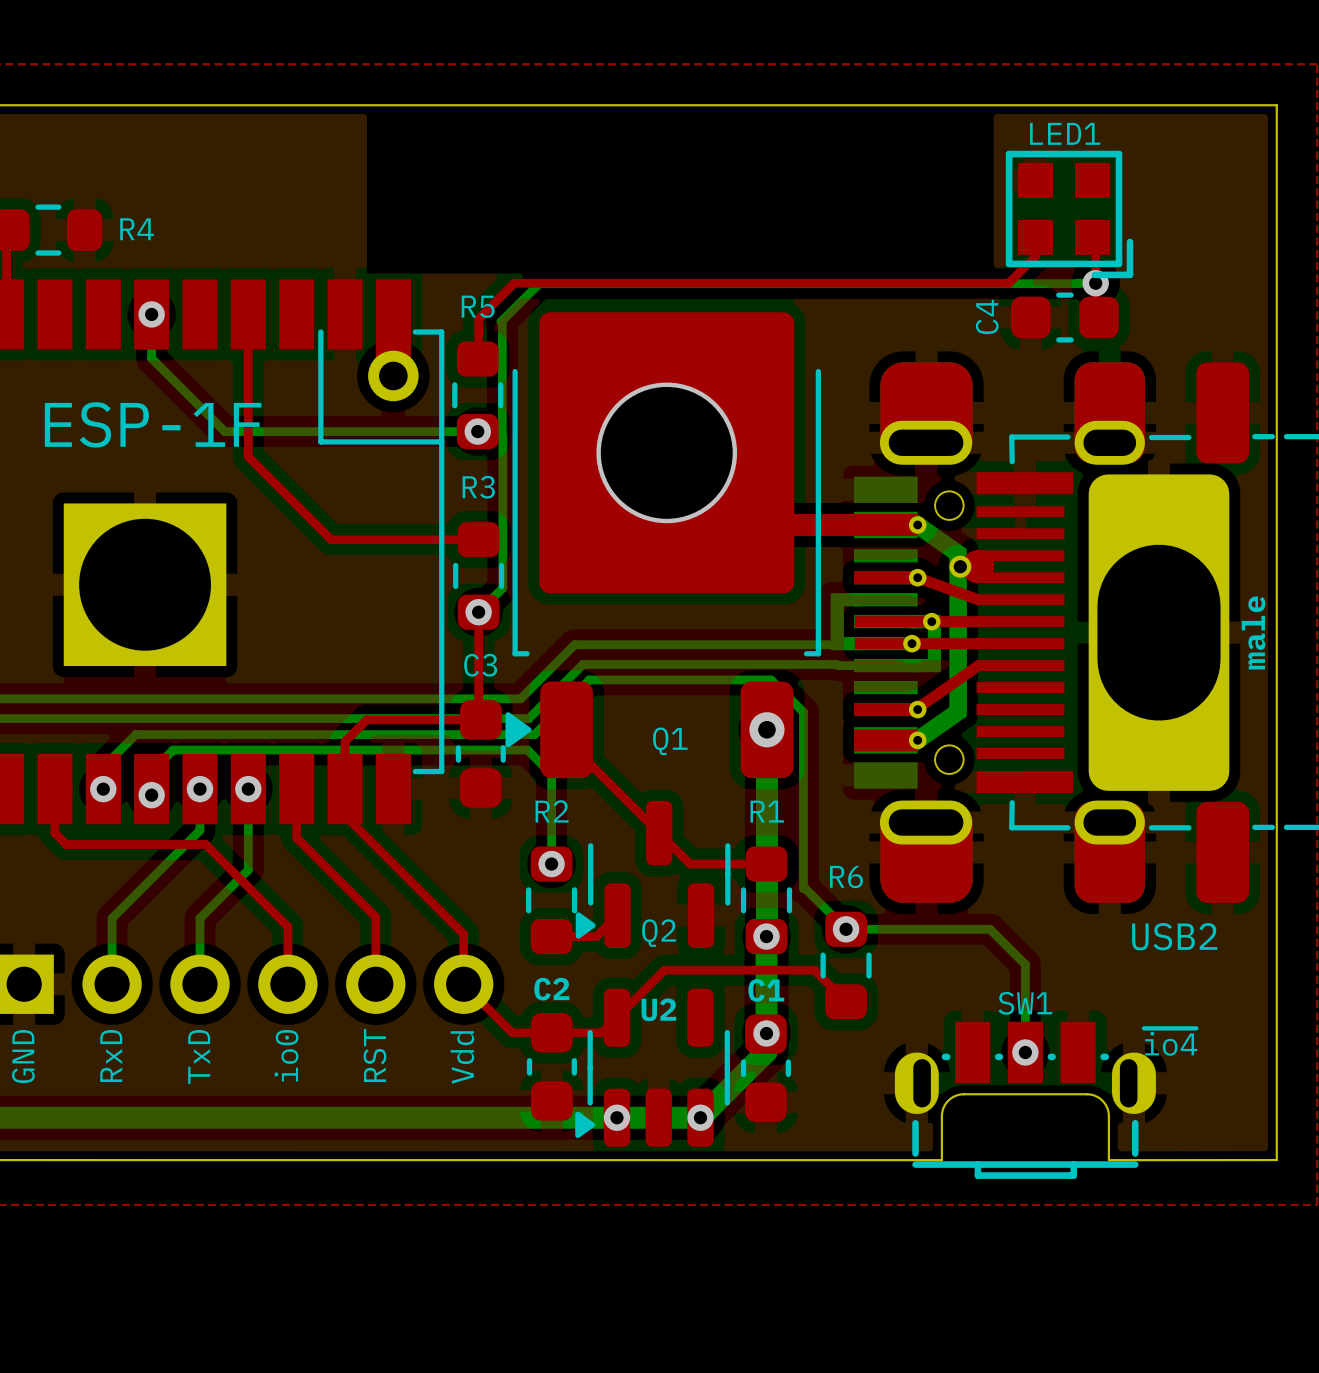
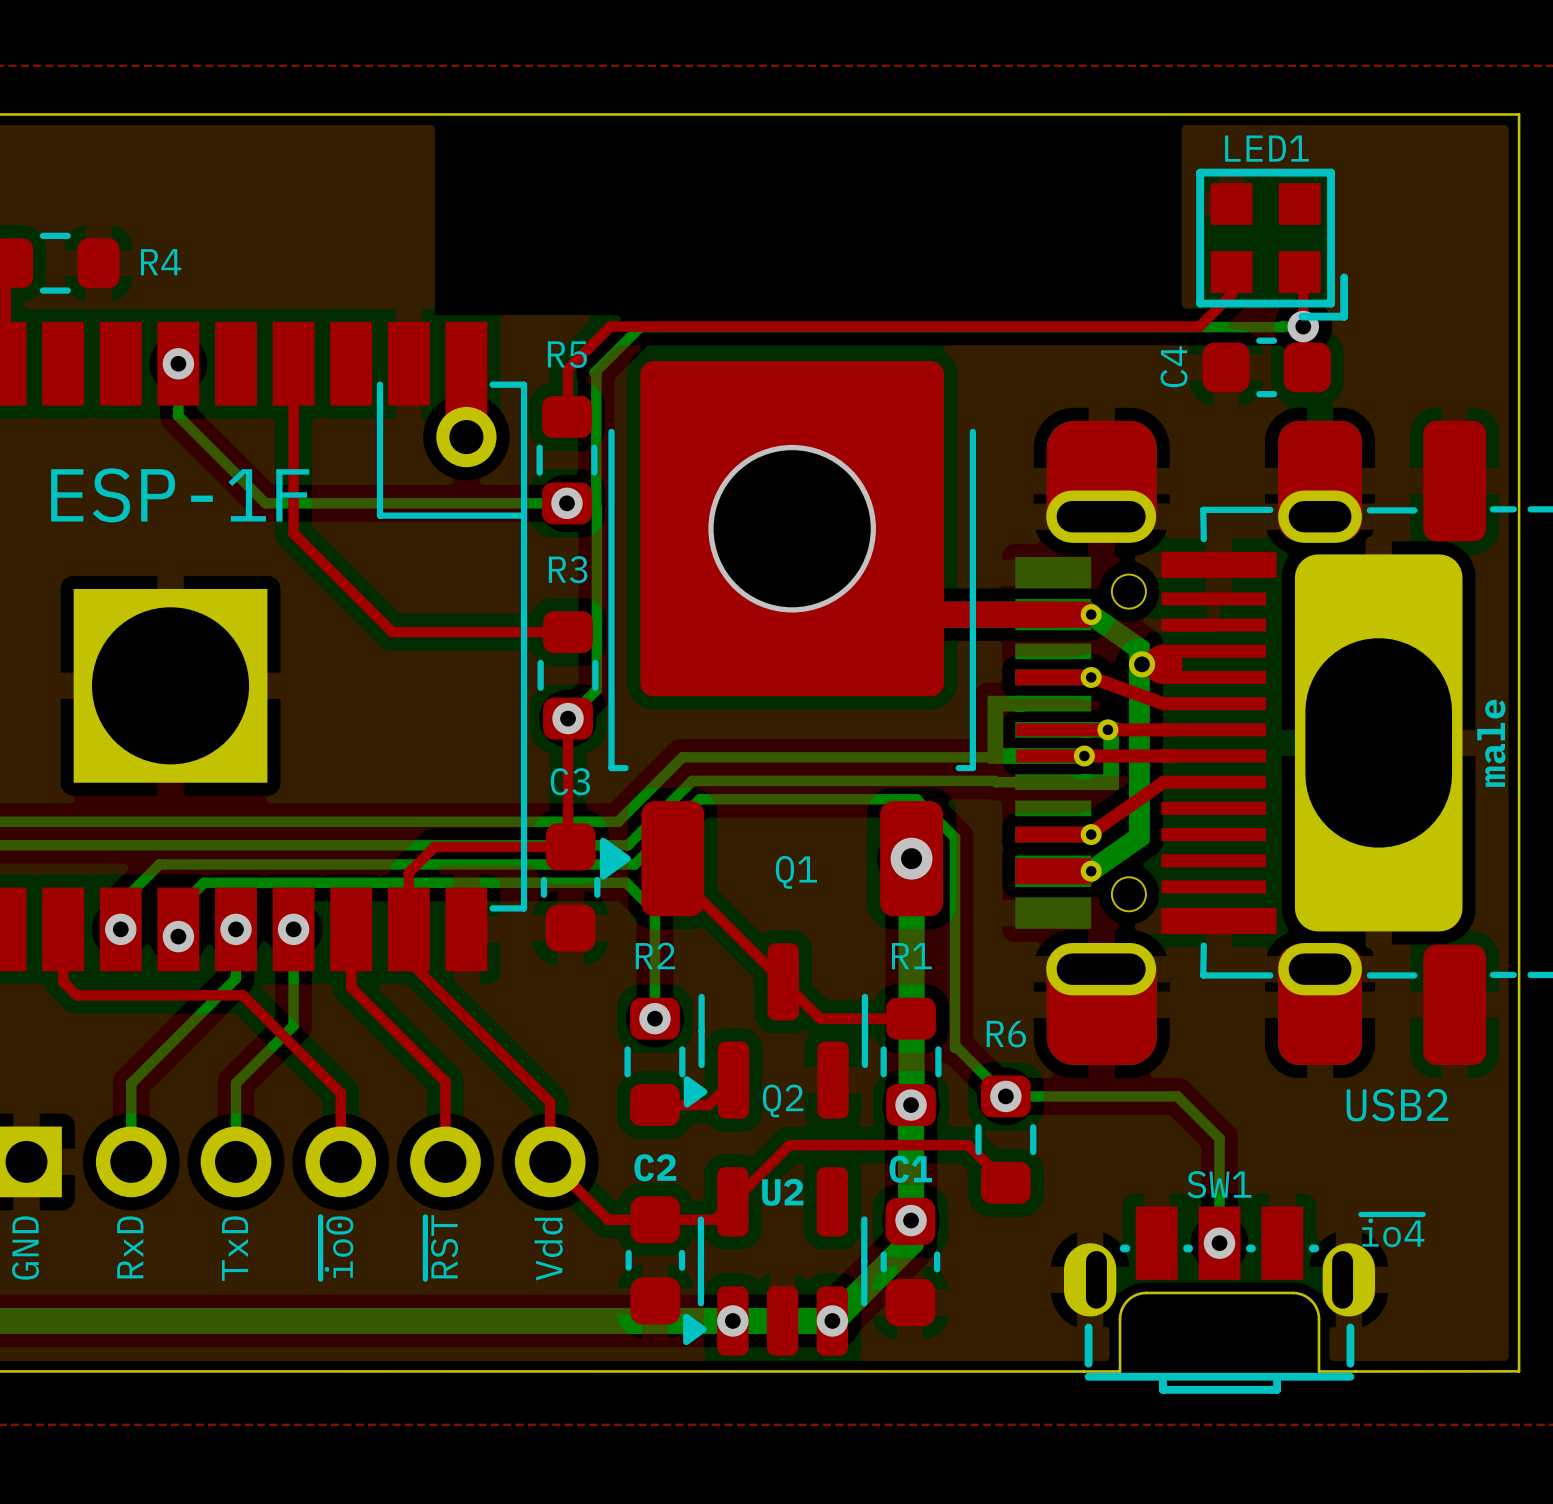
text: io0 (286, 1055) -> ~{io0} (336, 1247)
text: RST (374, 1055) -> ~{RST} (441, 1247)

